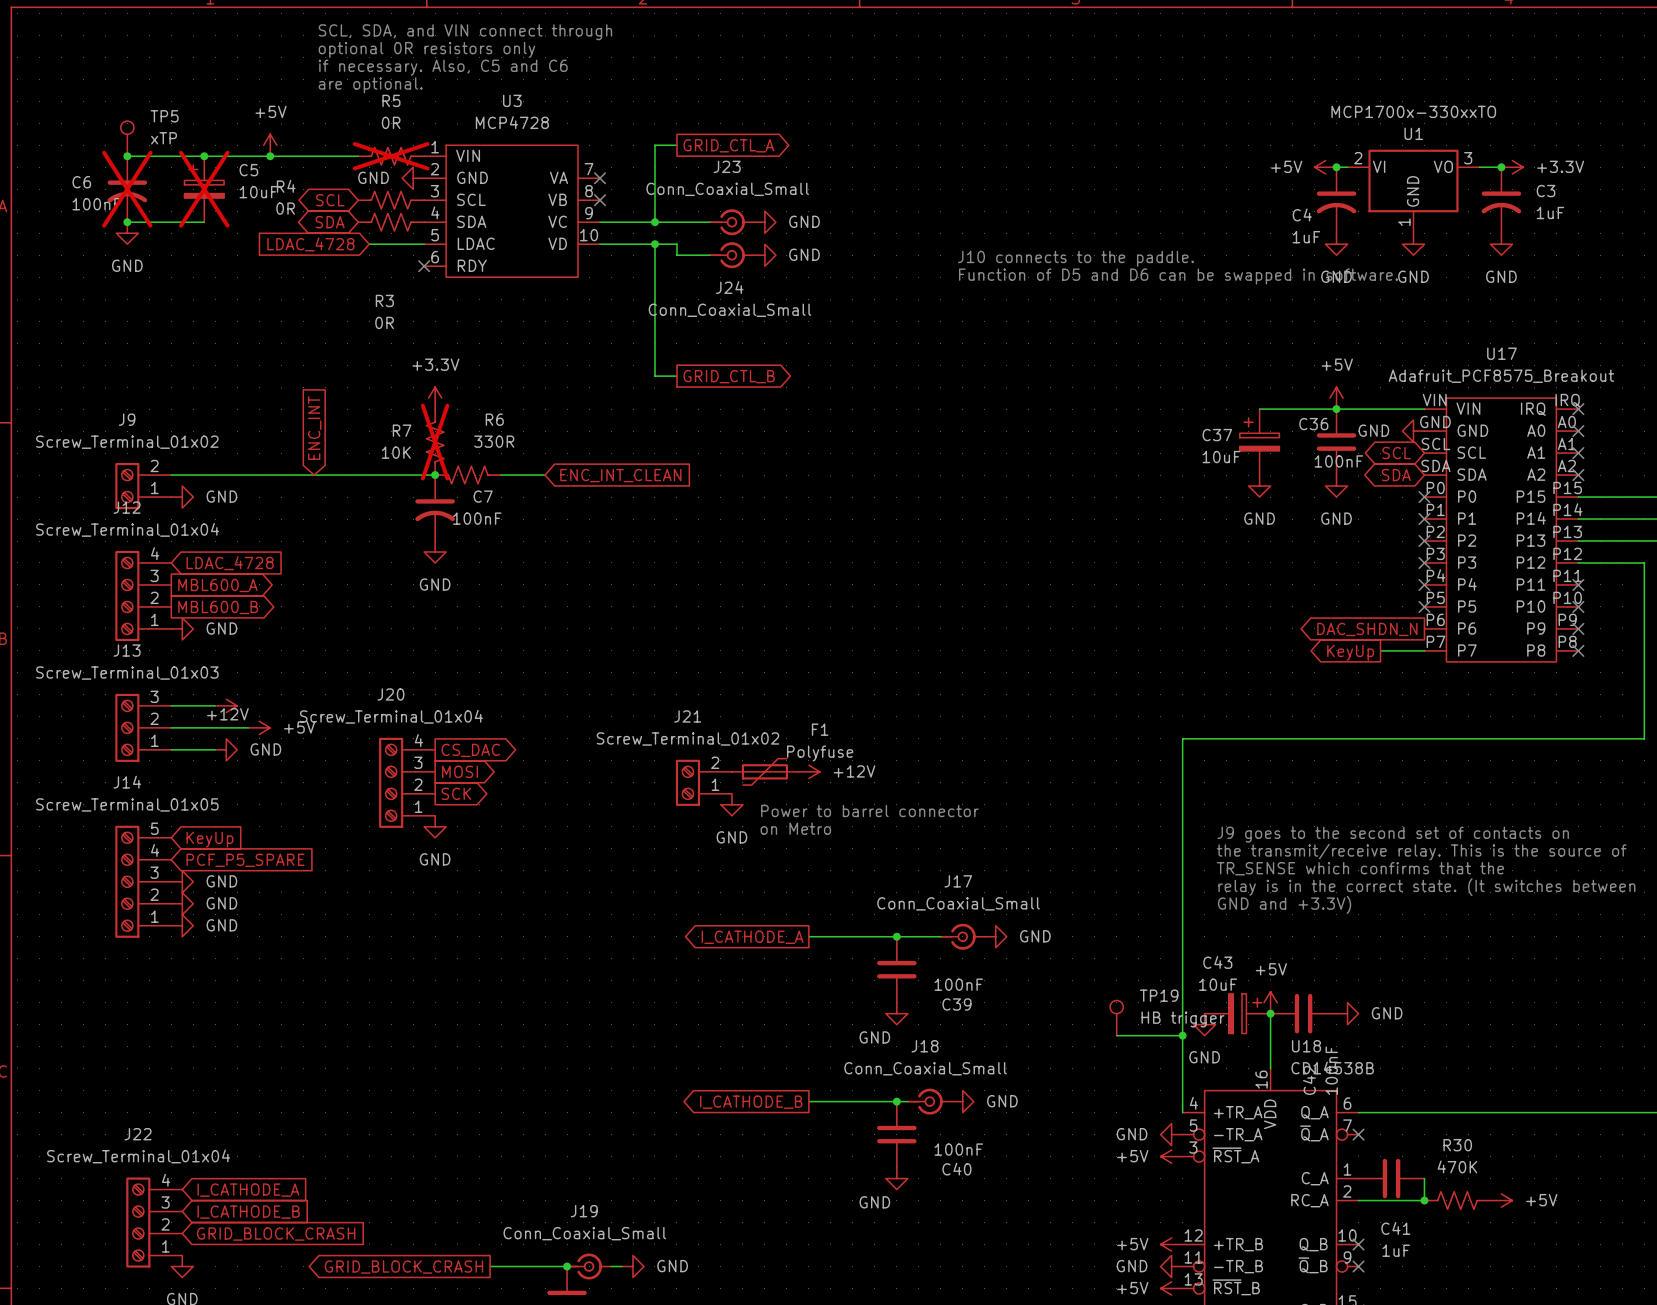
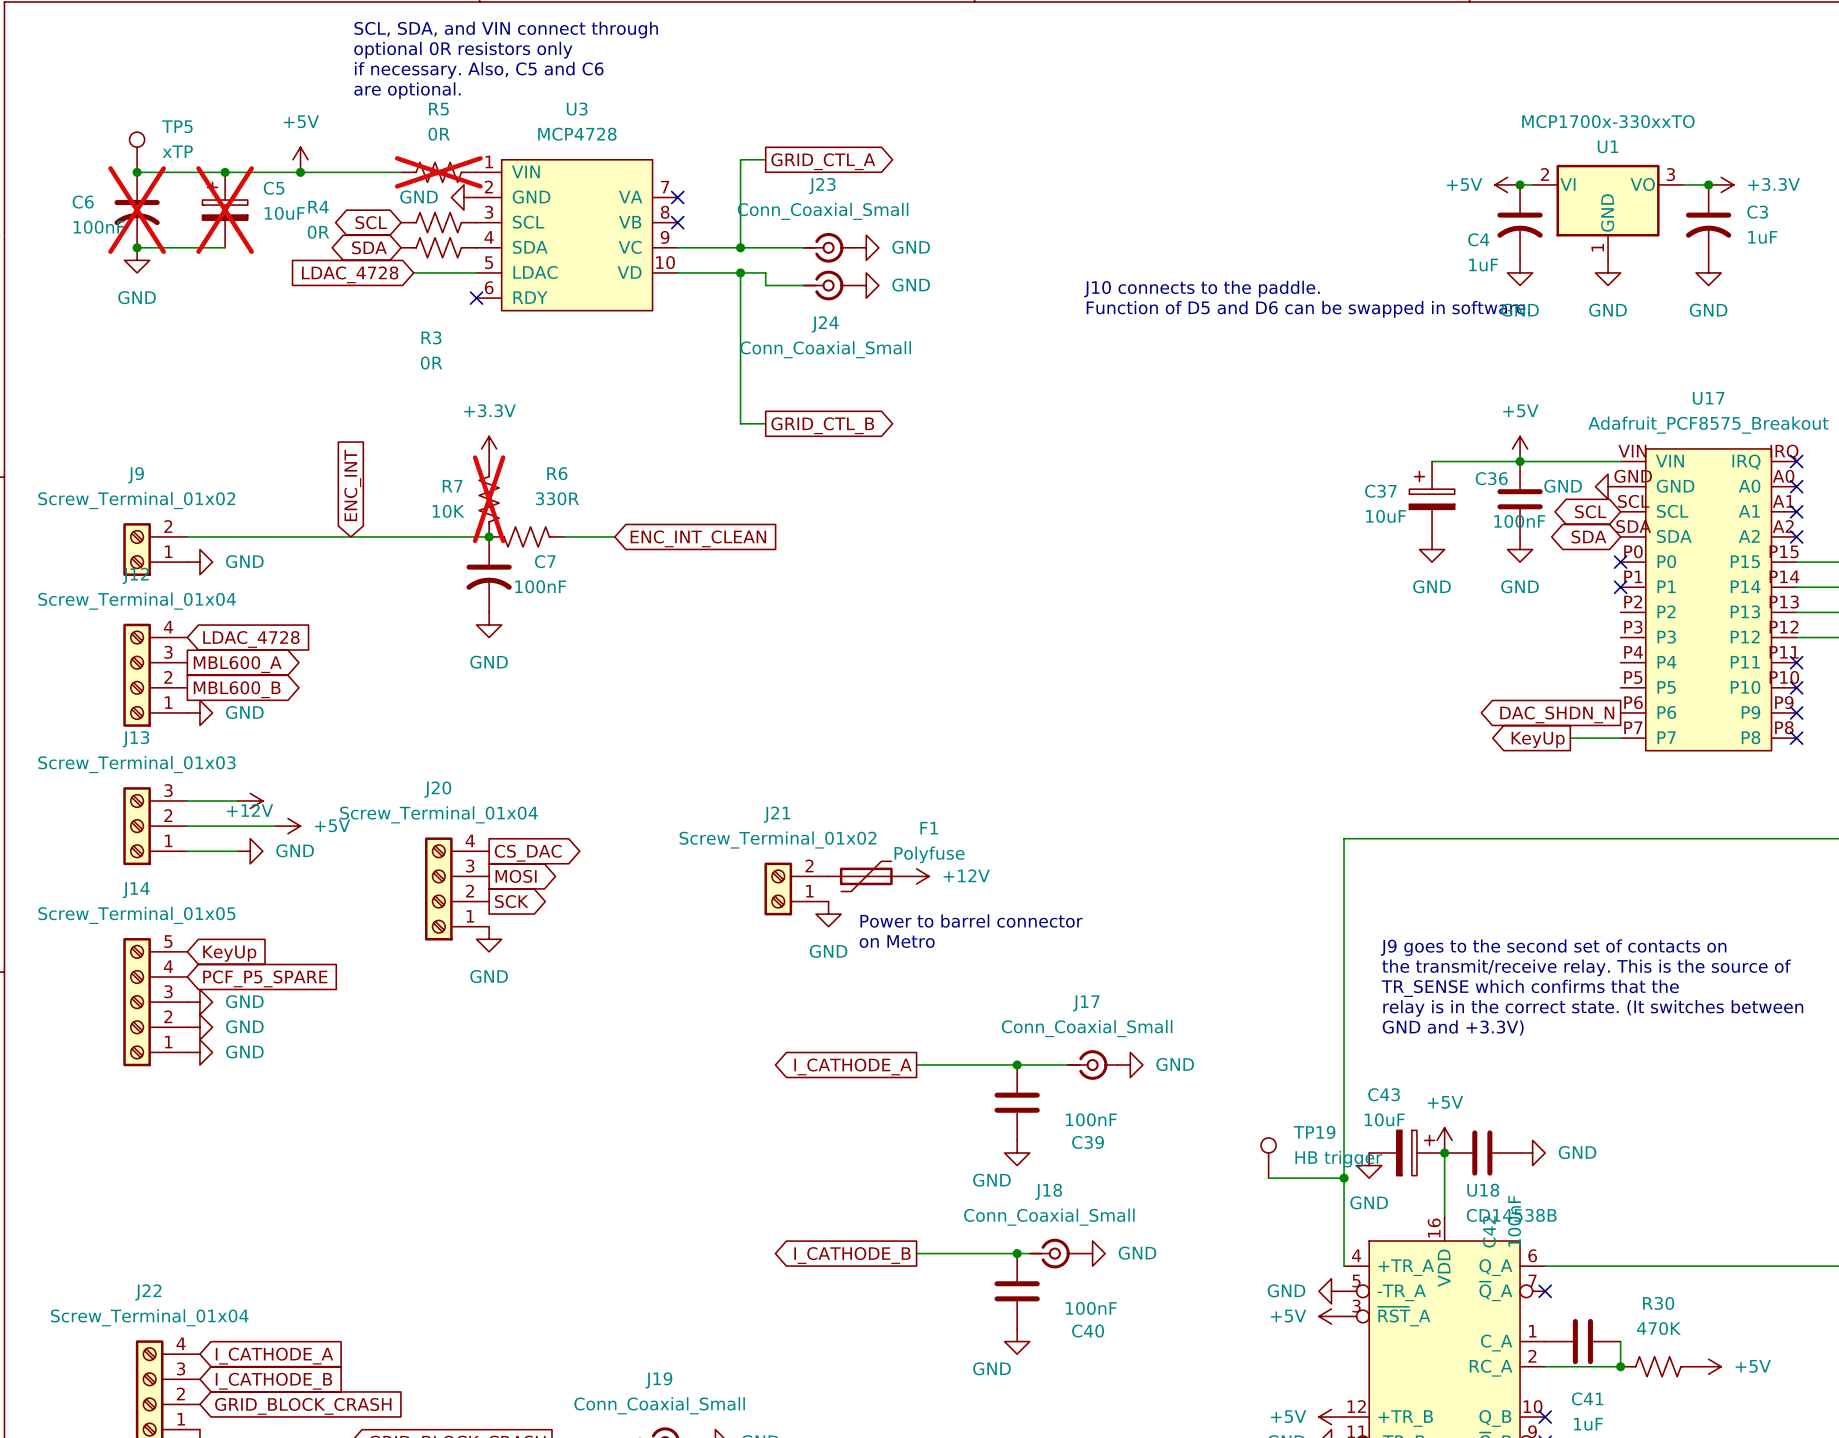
no-connect mark: (1424, 541) -> none
no-connect mark: (1424, 562) -> none
no-connect mark: (1424, 584) -> none
no-connect mark: (1424, 606) -> none

